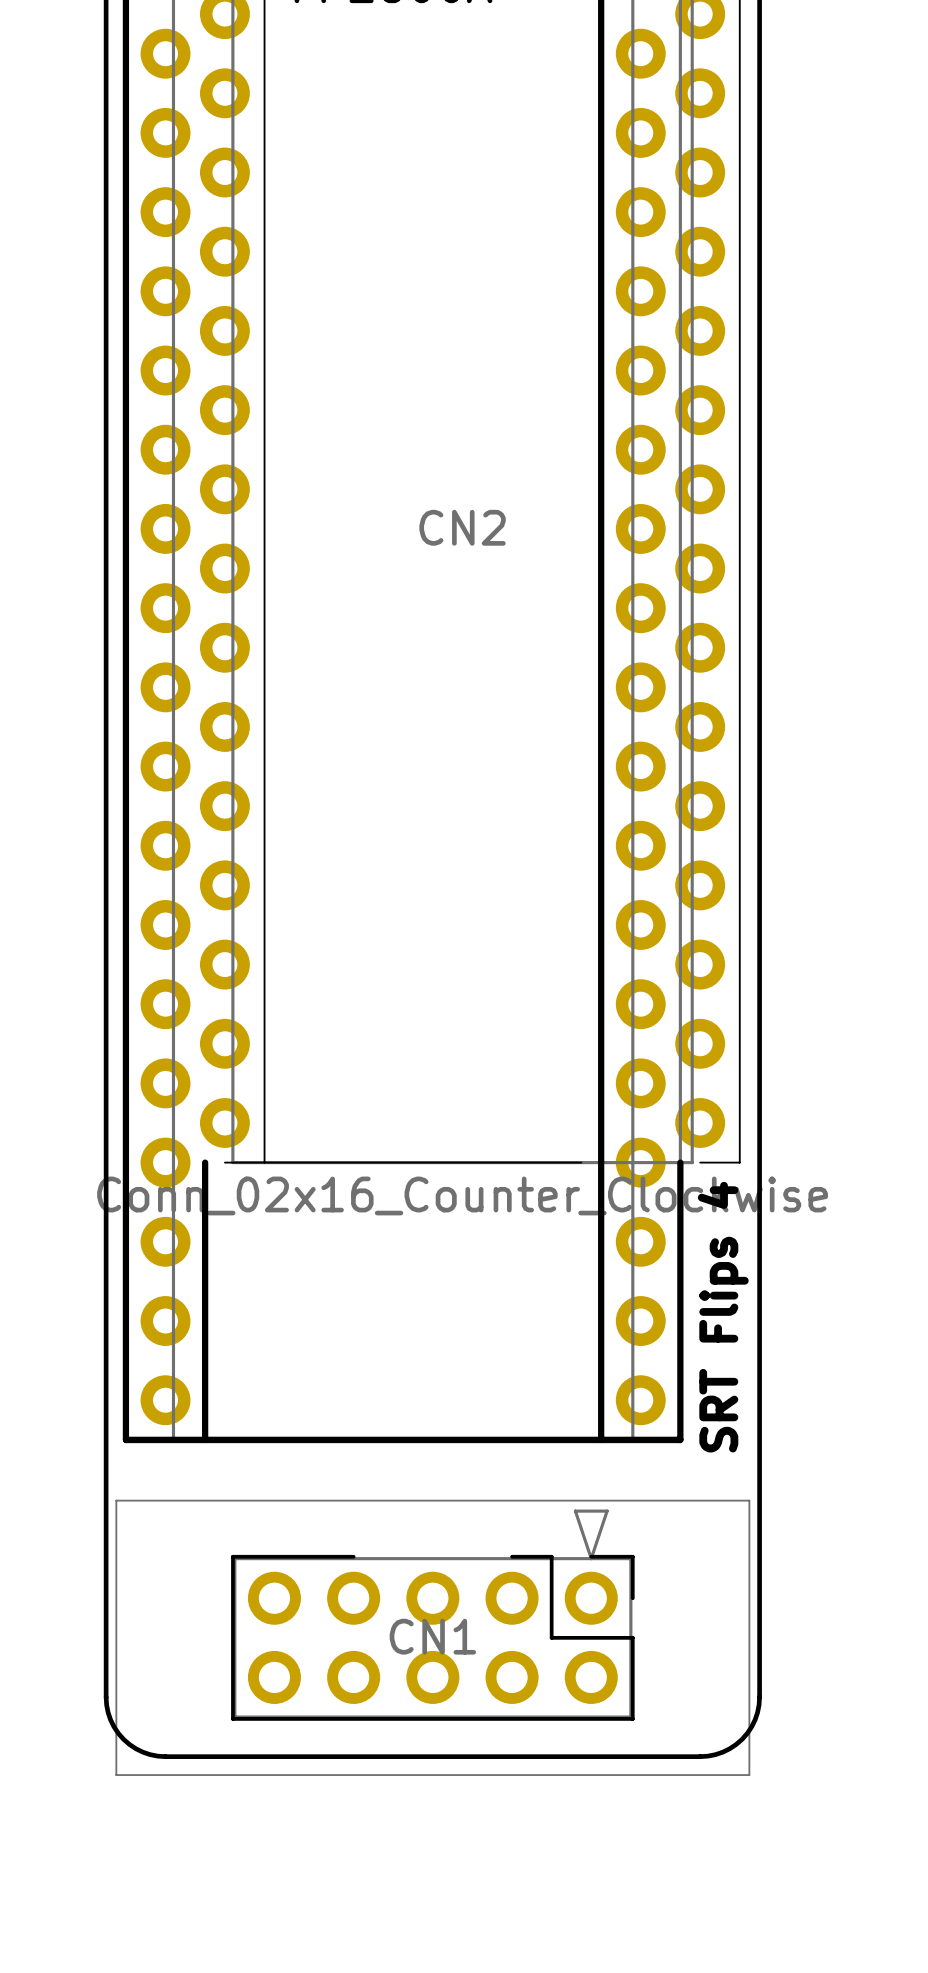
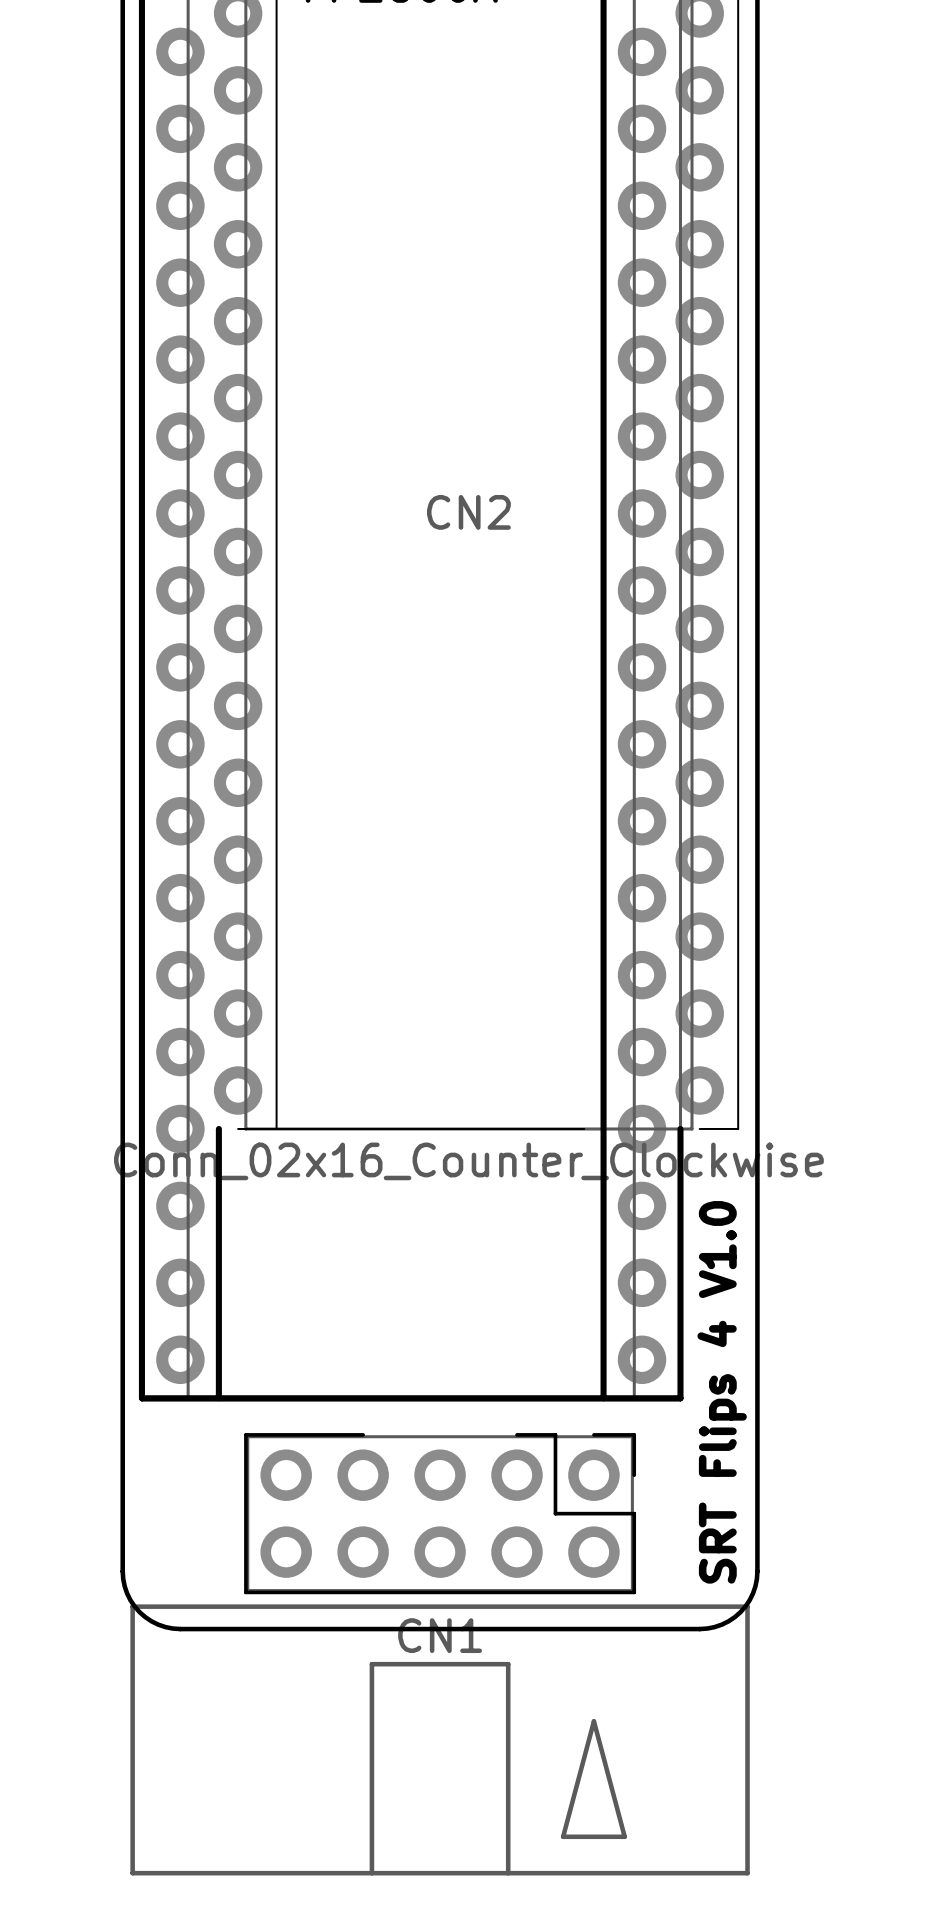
text: SRT Flips 4 (723, 1317) -> SRT Flips 4 V1.0 (722, 1392)
CN1 footprint: [115, 1499, 751, 1776] -> [130, 1433, 750, 1876]
board edge: (106, 1618) (106, 1697) (110, 1719) (123, 1739) (135, 1748) (150, 1754) (165, 1756) (700, 1756) (715, 1754) (729, 1748) (742, 1739) (751, 1726) (757, 1712) (759, 1697) (759, 1618) -> (122, 1571) (127, 1593) (139, 1612) (158, 1624) (180, 1629) (707, 1628) (721, 1624) (740, 1612) (753, 1593) (757, 1571)

